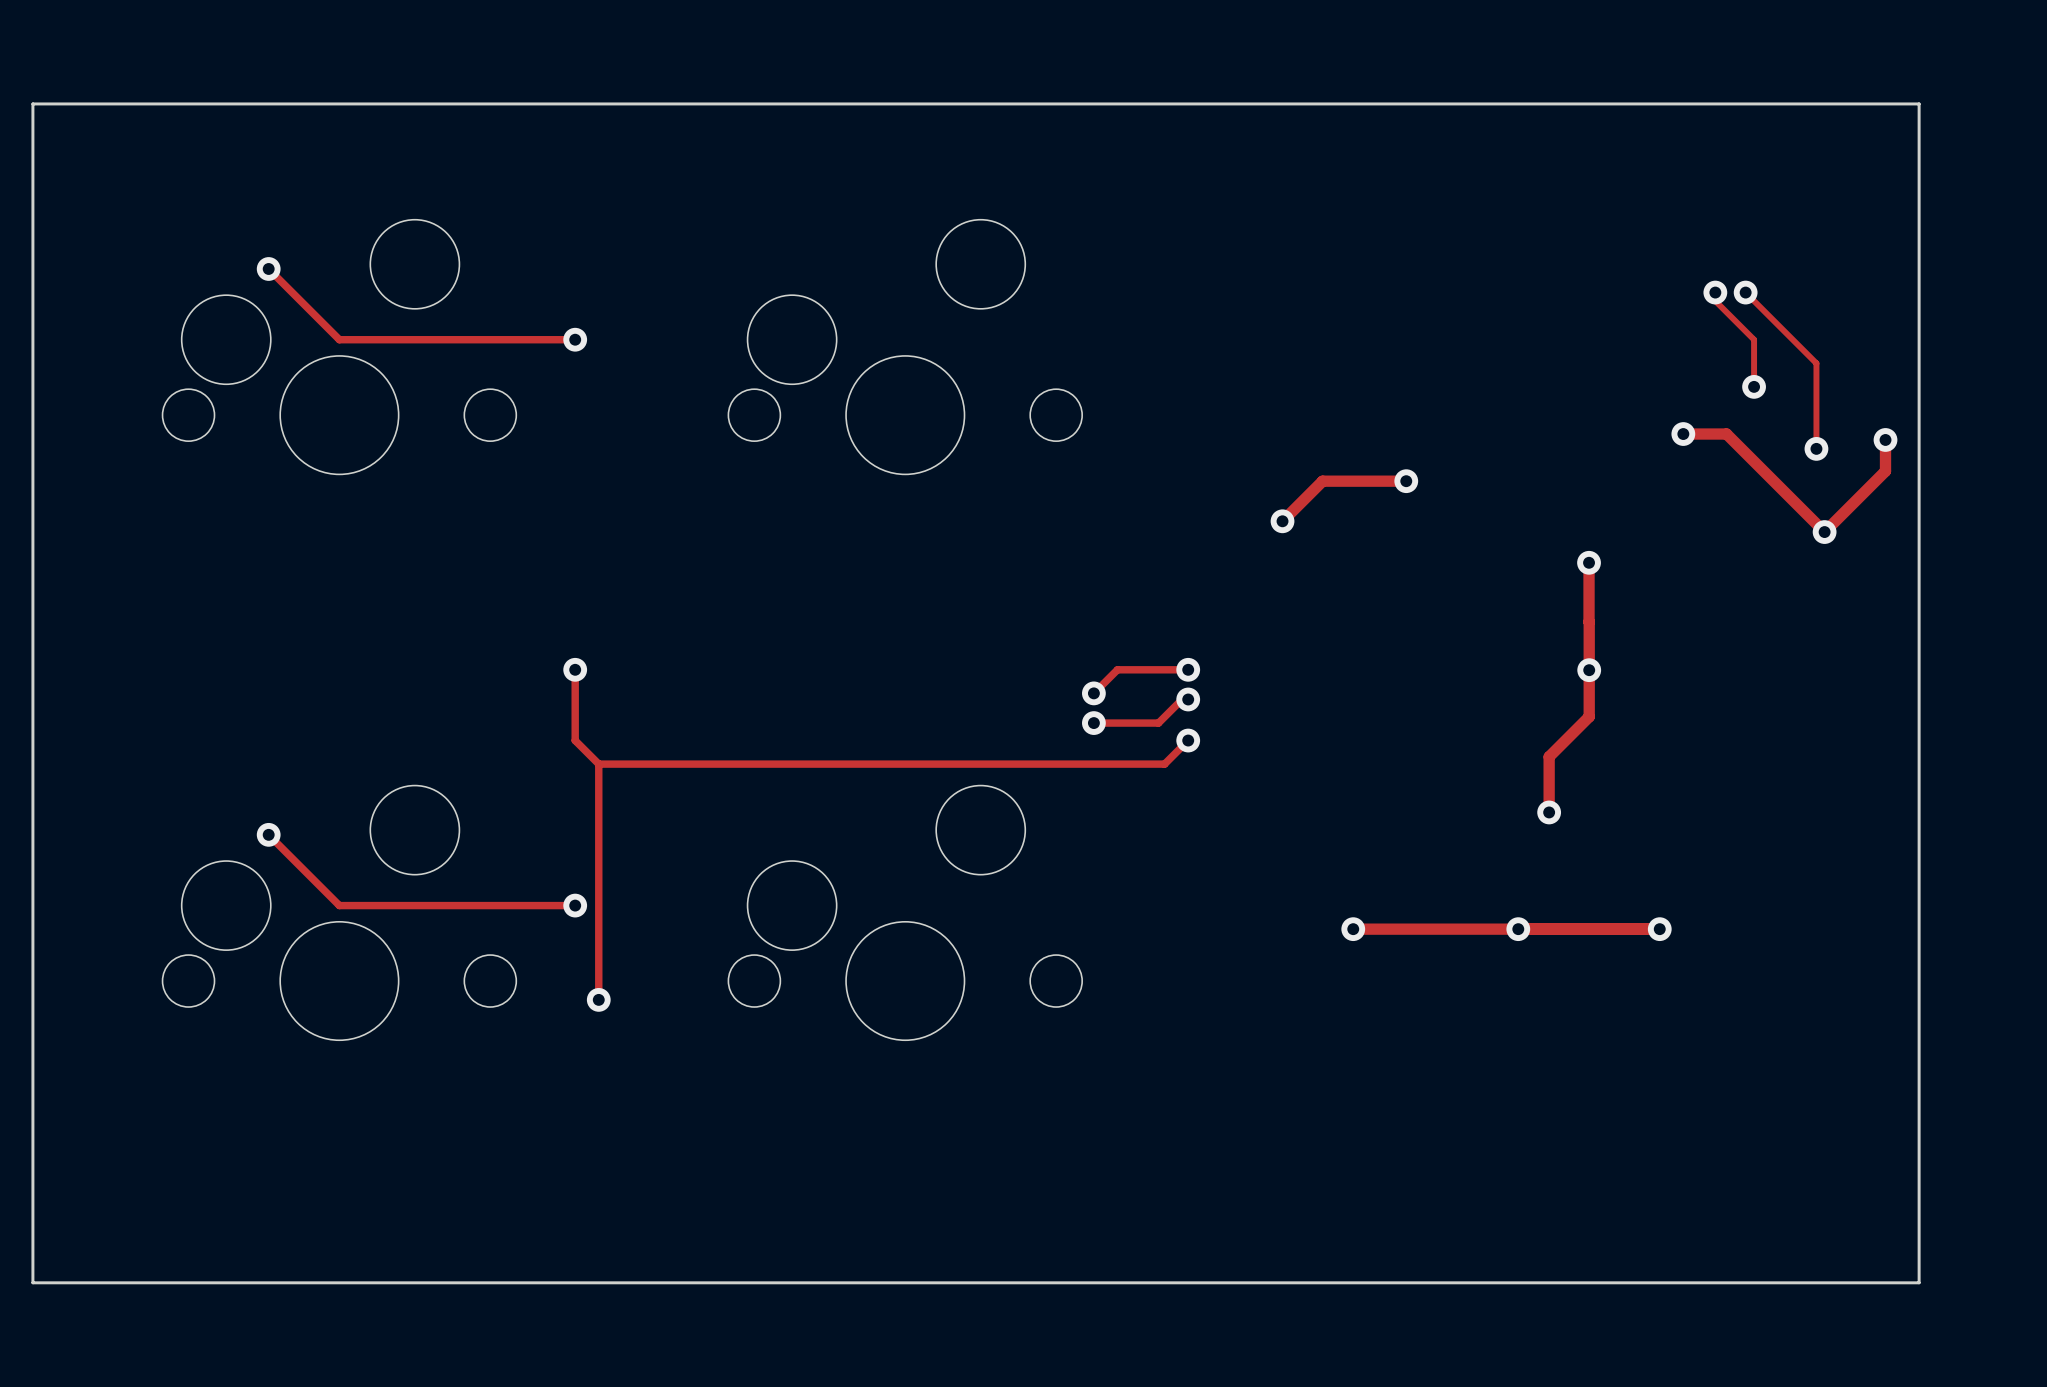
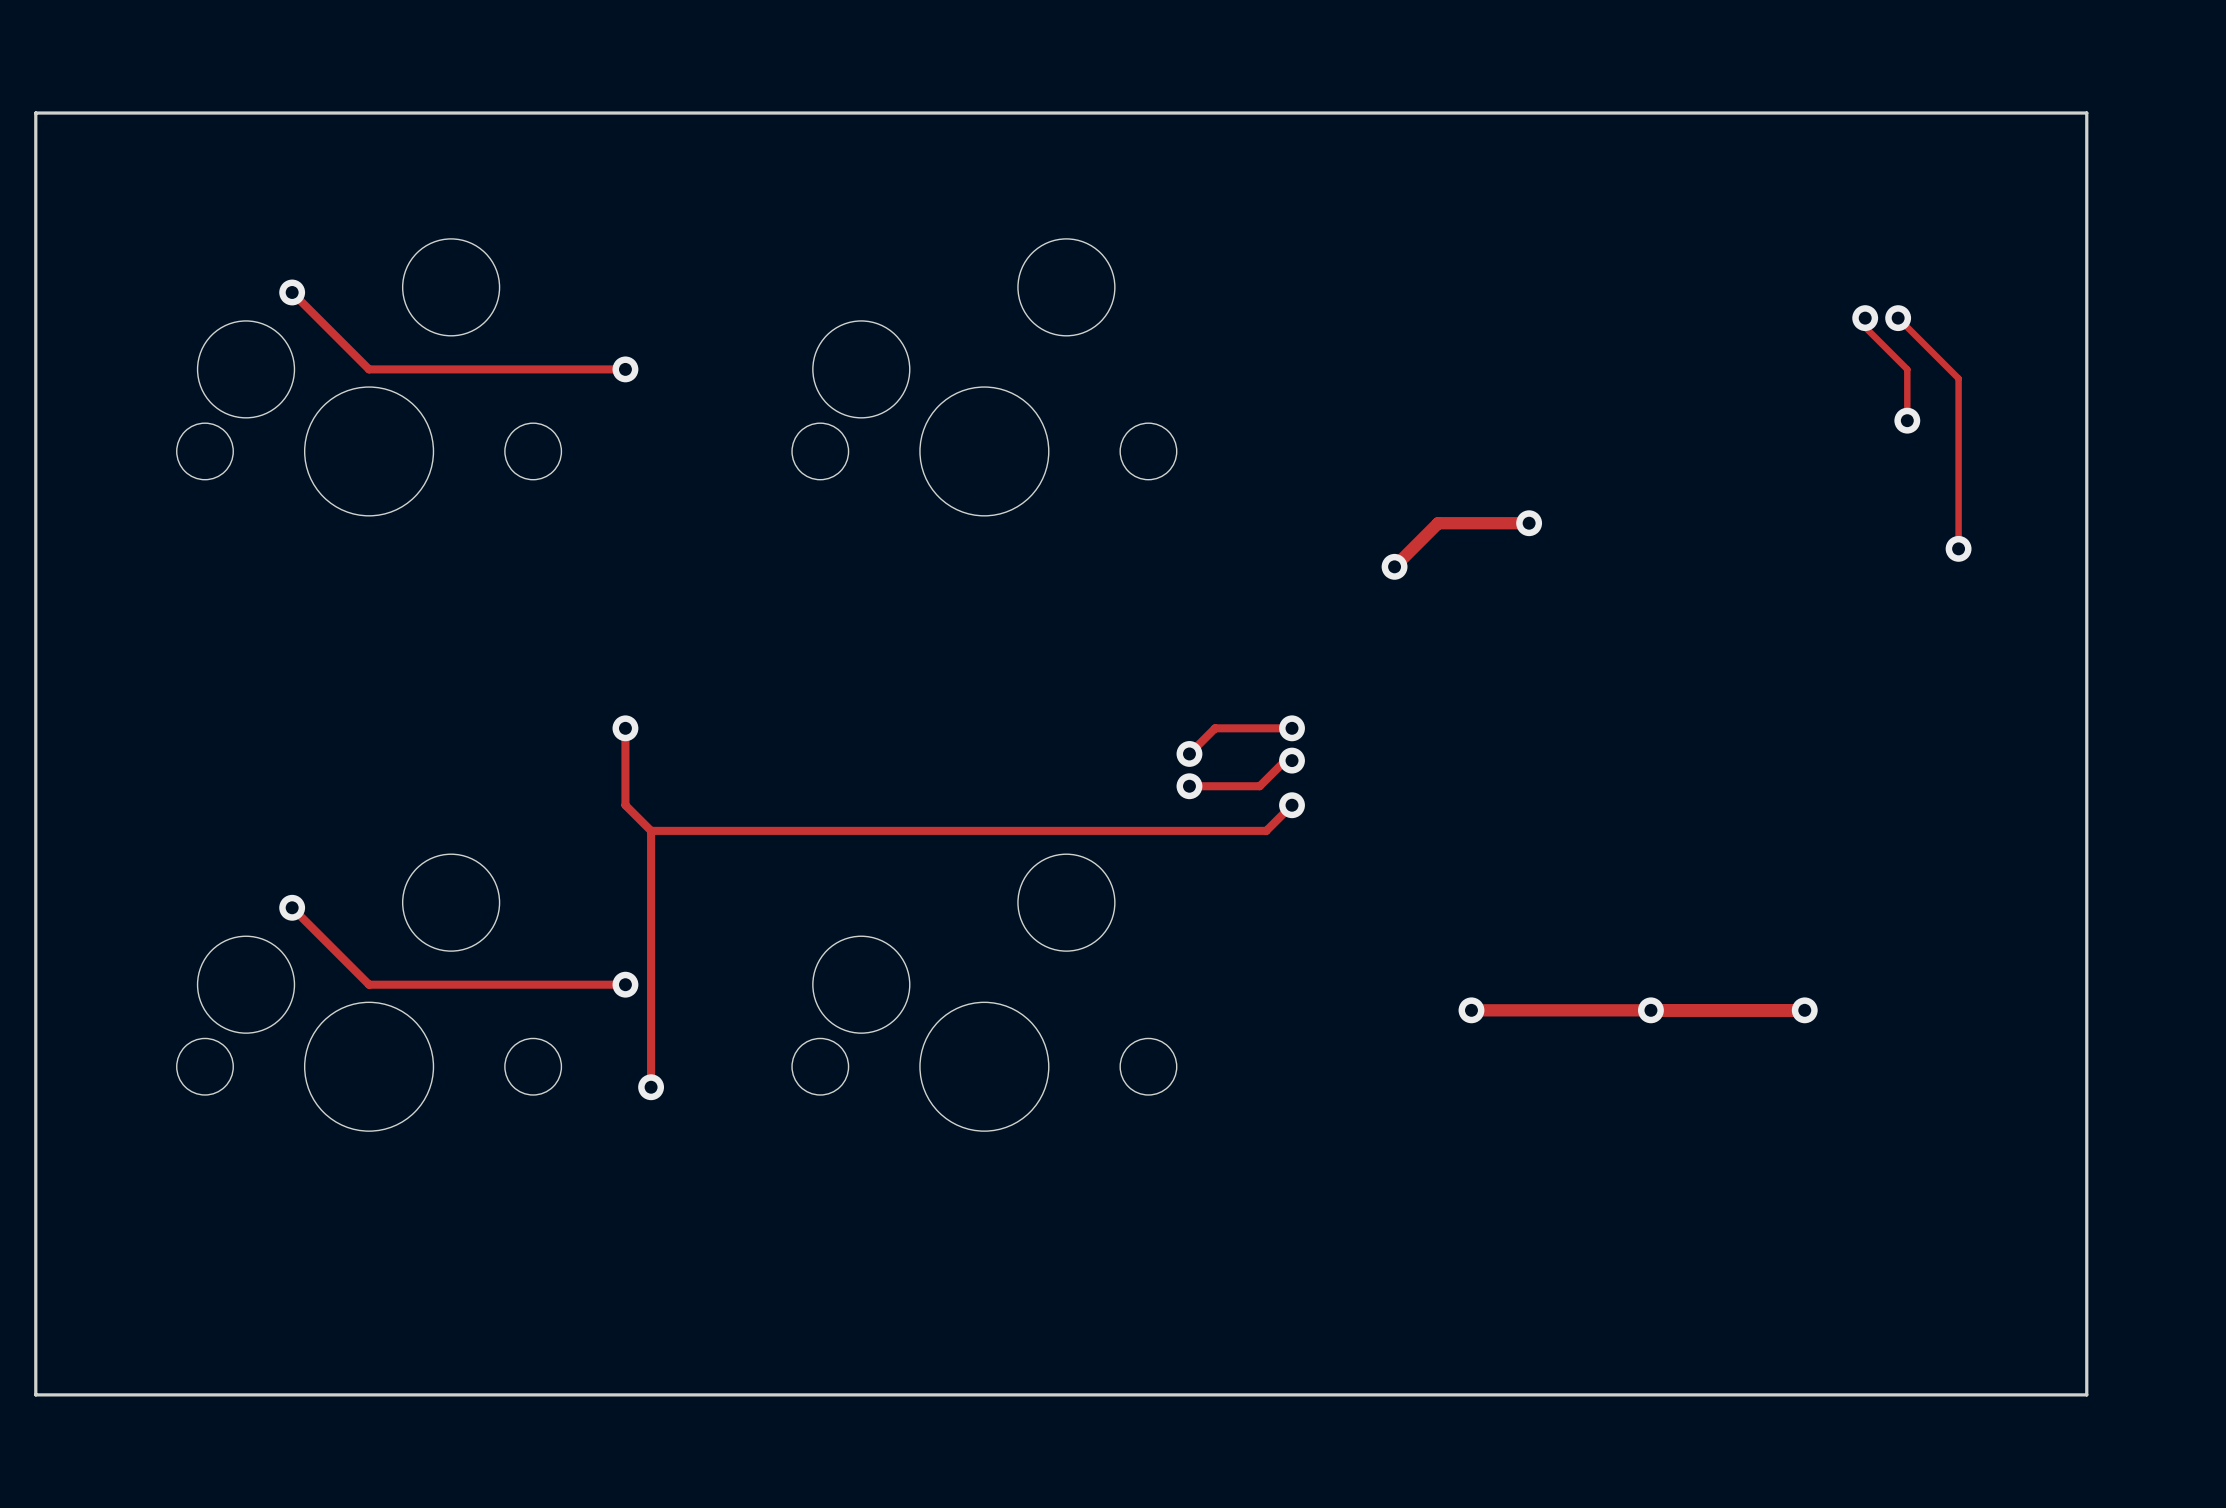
track: (1801, 348) (1816, 363) (1816, 448) -> (1958, 378) (1958, 548)
track: (1683, 434) (1726, 434) (1824, 532) (1885, 471) (1885, 439) -> none
via: (1683, 434) -> none
via: (1885, 439) -> none
via: (1816, 448) -> none
via: none -> (1958, 548)
via: (1824, 532) -> none
track: (1589, 562) (1589, 621) -> none
via: (1589, 562) -> none
track: (1589, 622) (1589, 716) (1549, 756) (1549, 812) -> none
via: (1589, 670) -> none
via: (1549, 812) -> none

